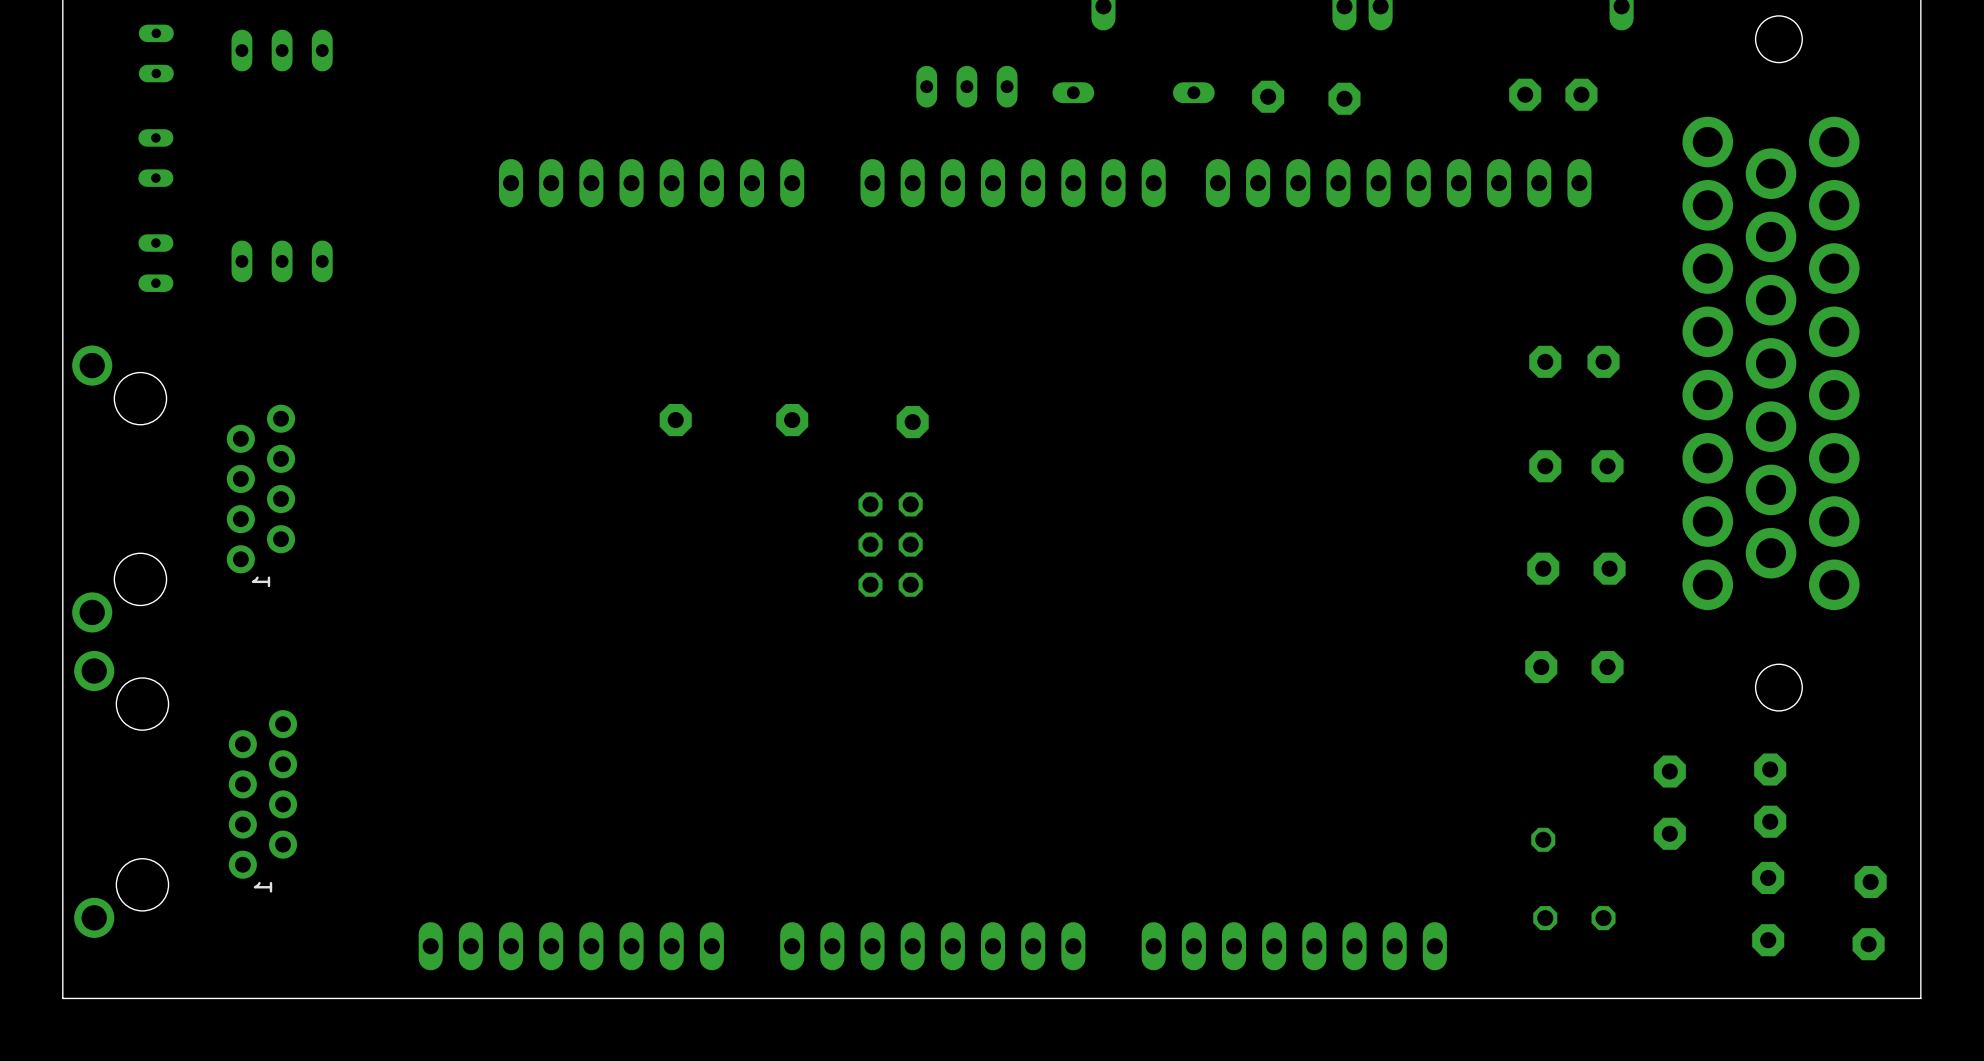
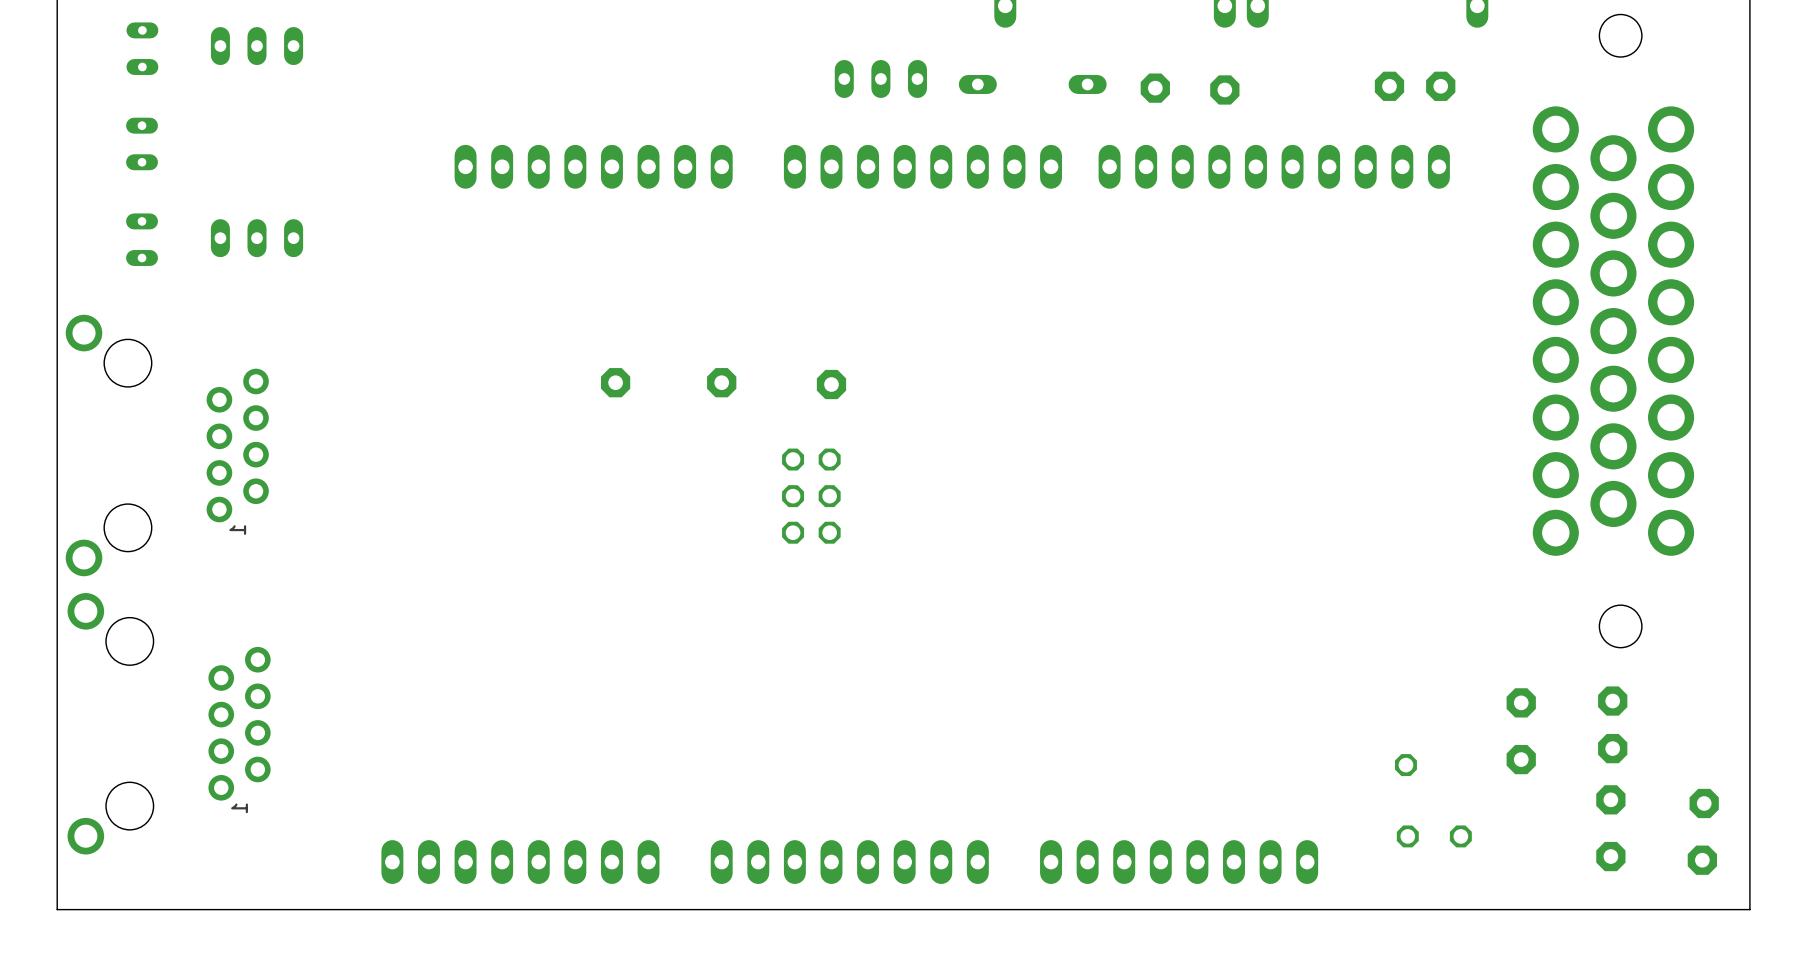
part: (1545, 361) -> none
part: (1603, 361) -> none
part: (1545, 466) -> none
part: (1607, 466) -> none
part: (1543, 568) -> none
part: (1609, 568) -> none
part: (1541, 667) -> none
part: (1607, 667) -> none

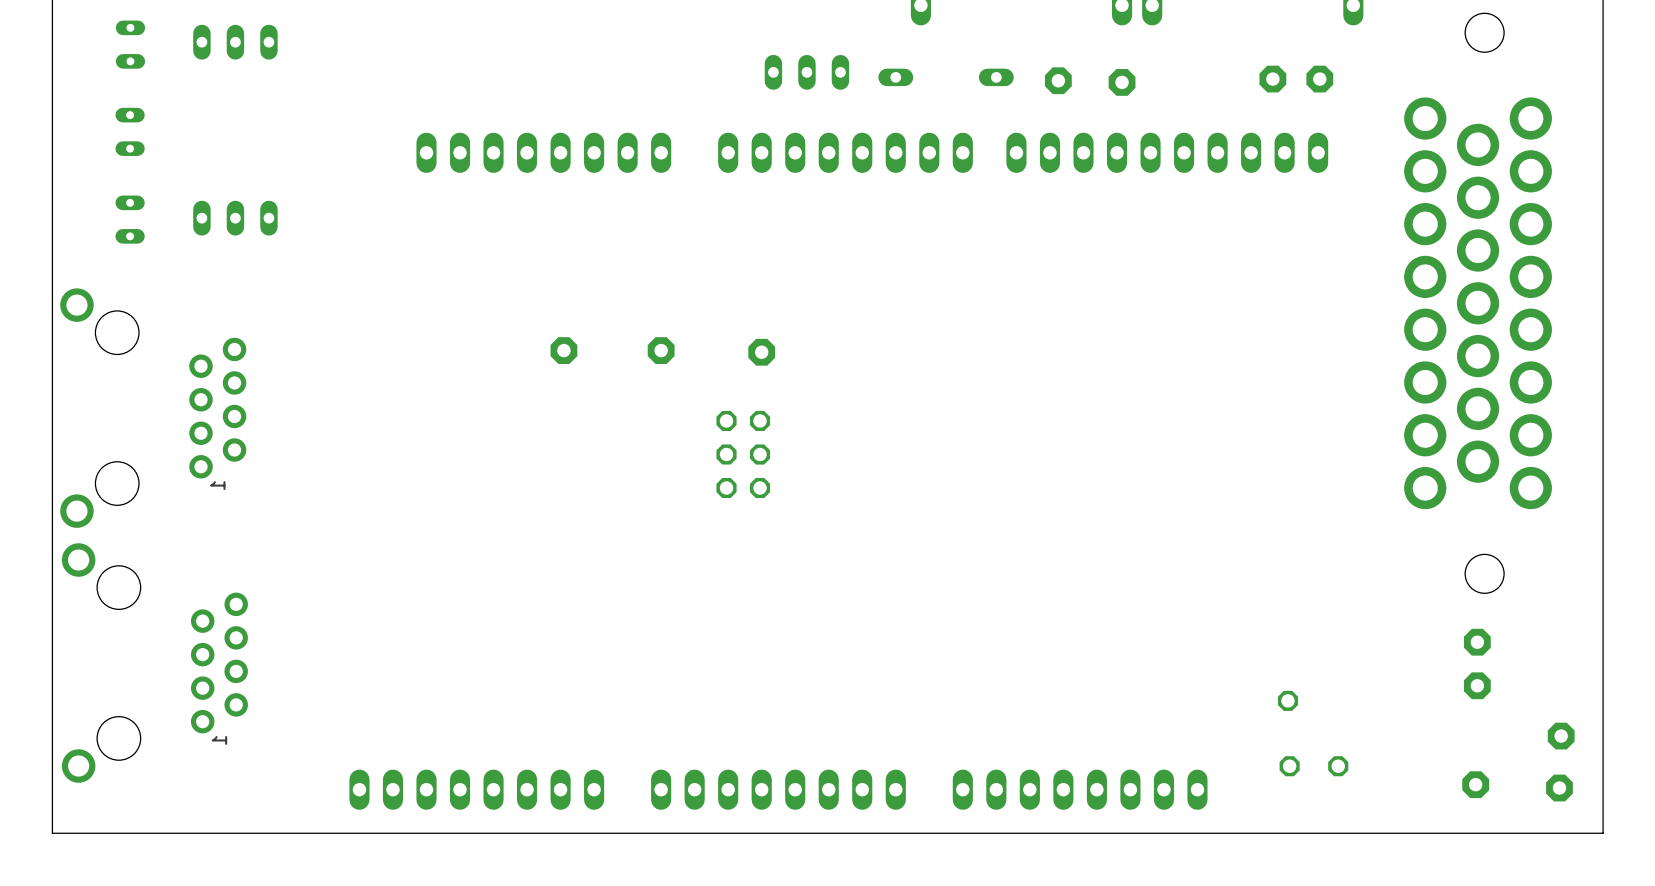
part: (1521, 702) -> none
part: (1521, 759) -> none
part: (1610, 799) -> none

